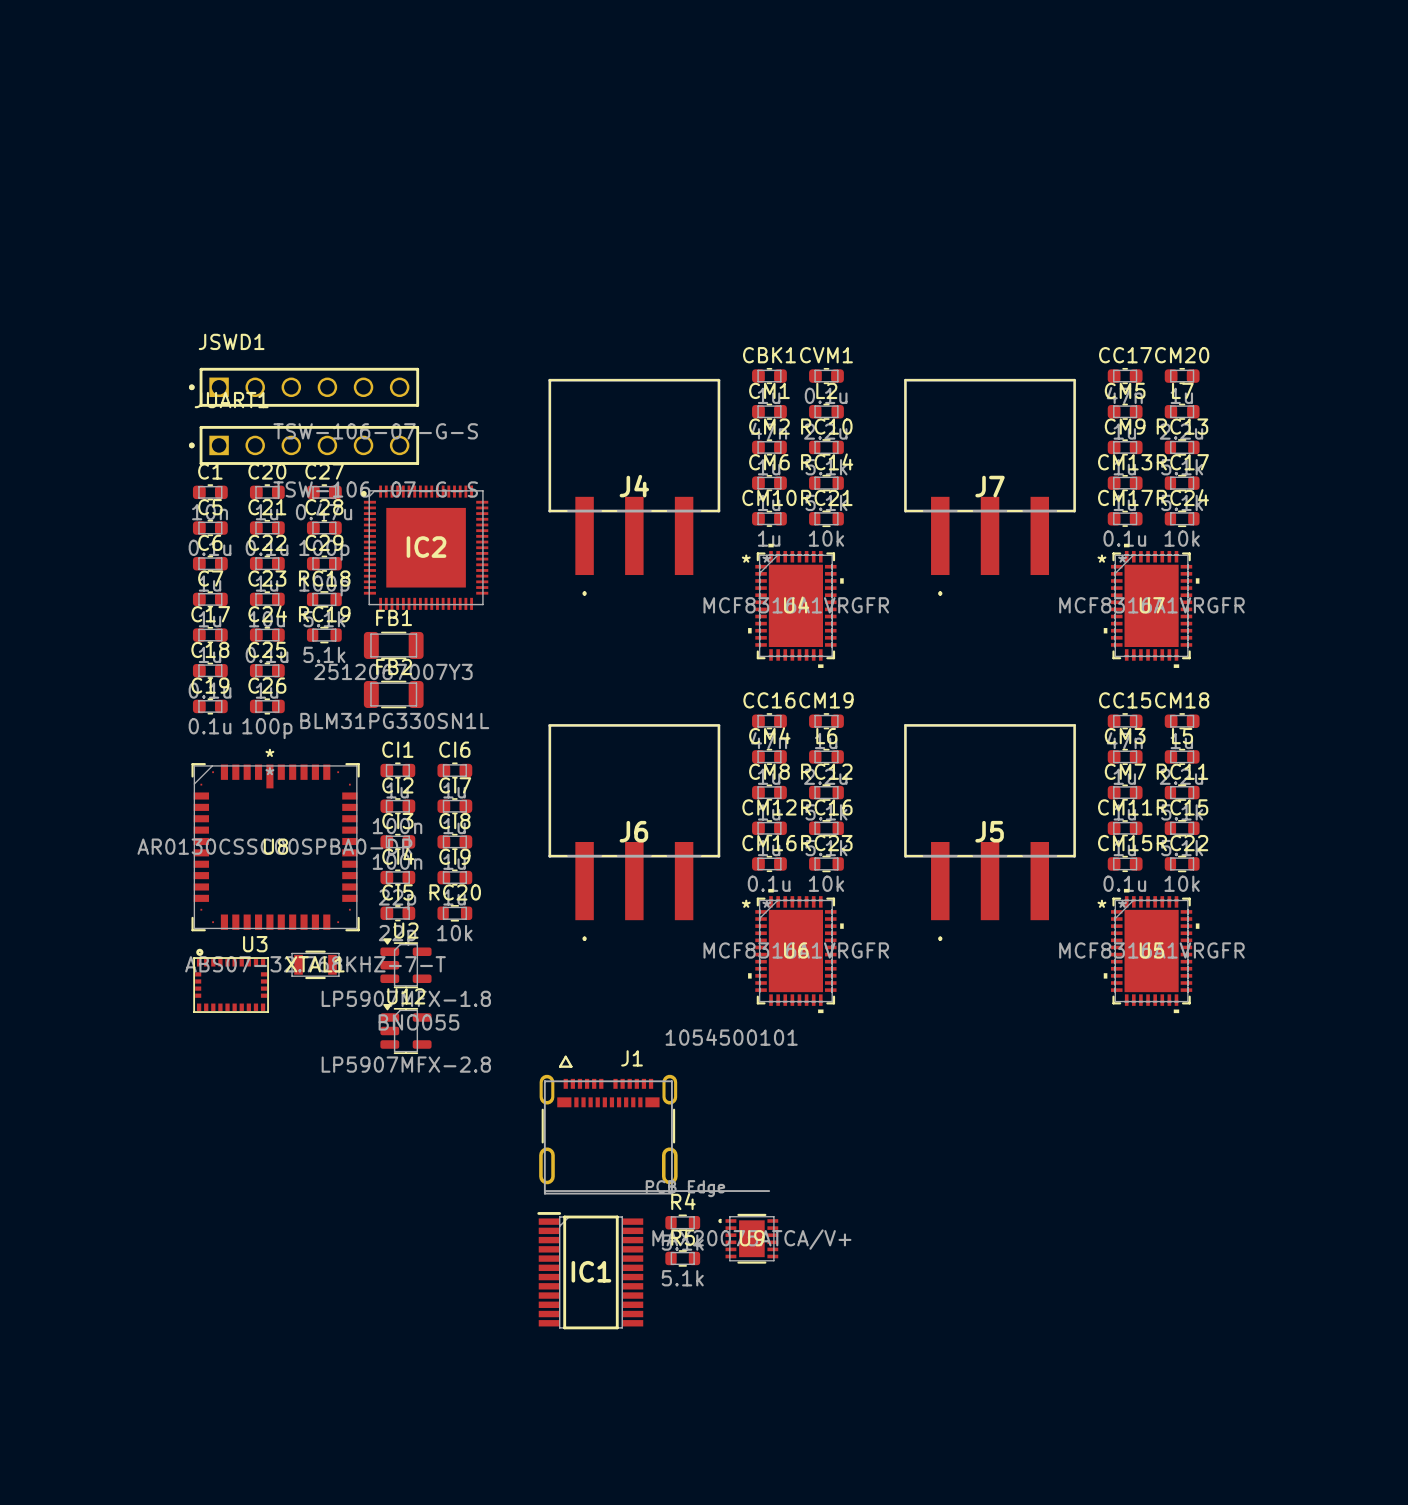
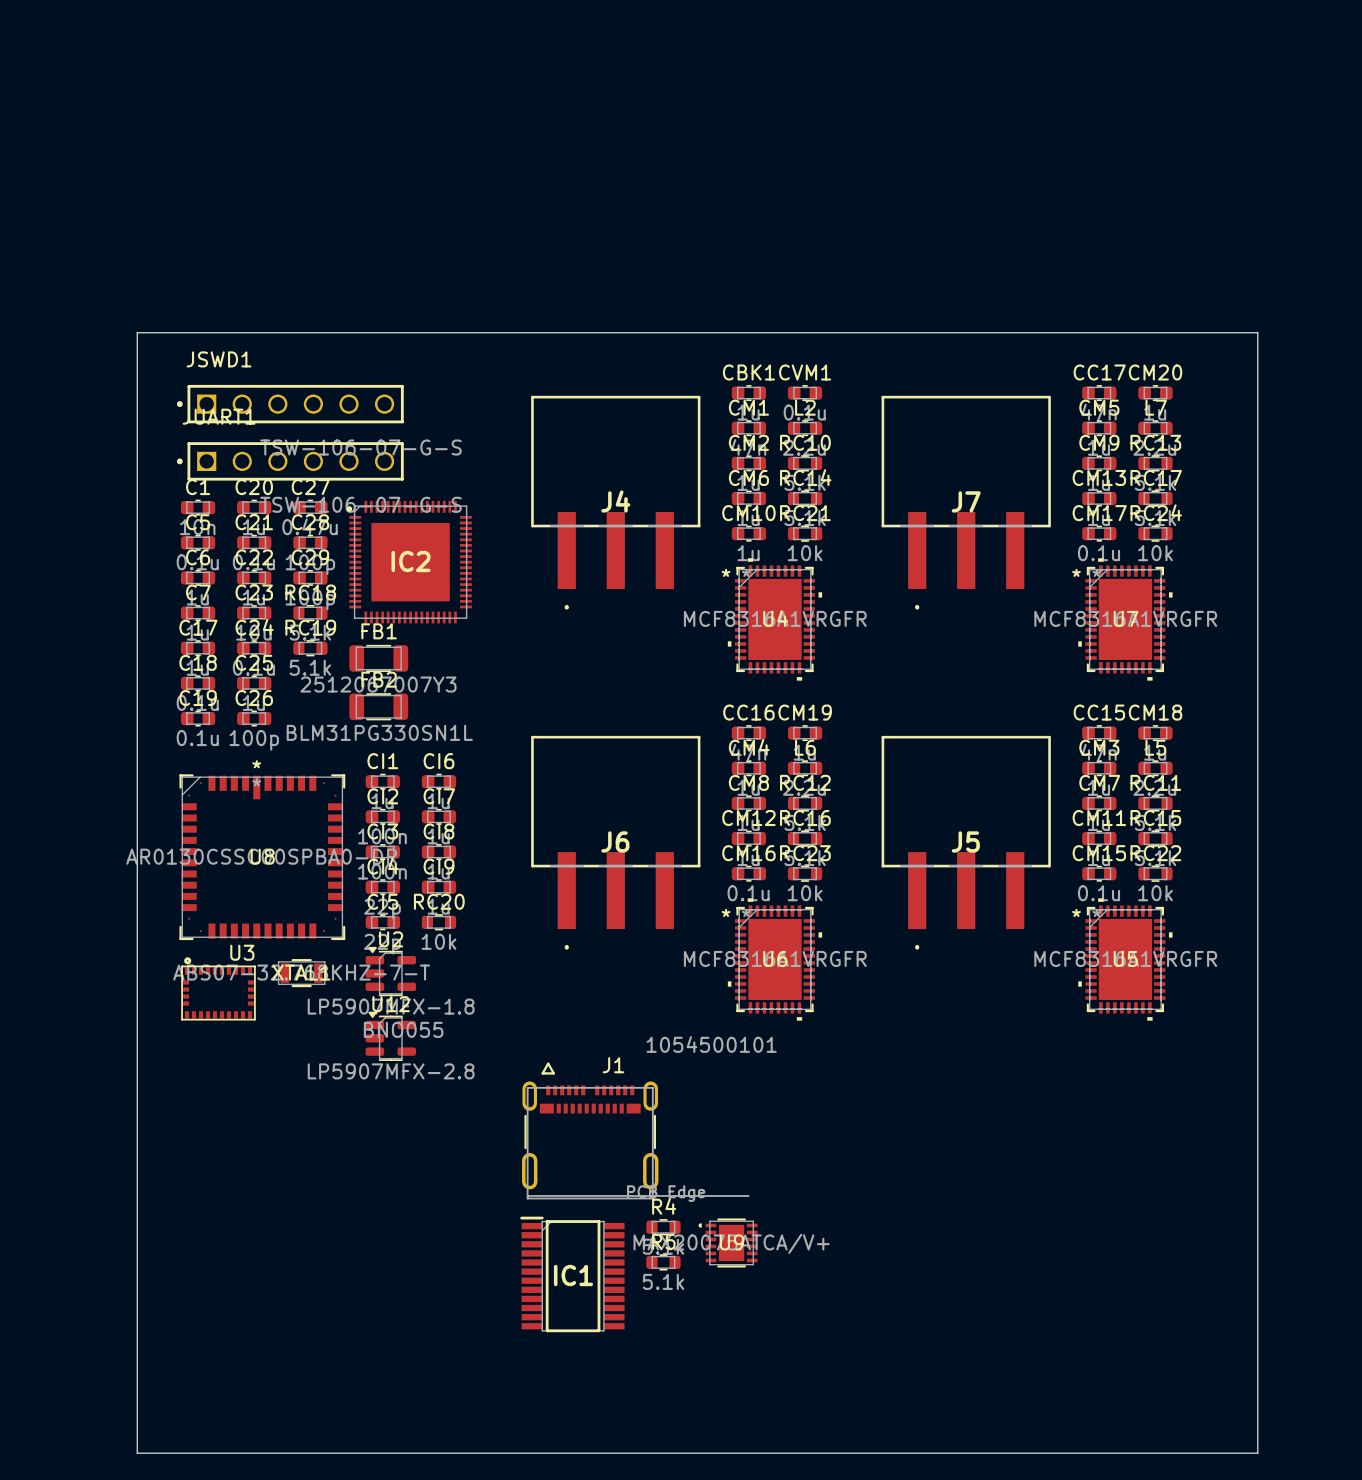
board edge: none -> (137, 332) (1257, 332) (1257, 1453) (137, 1453) (137, 332)

